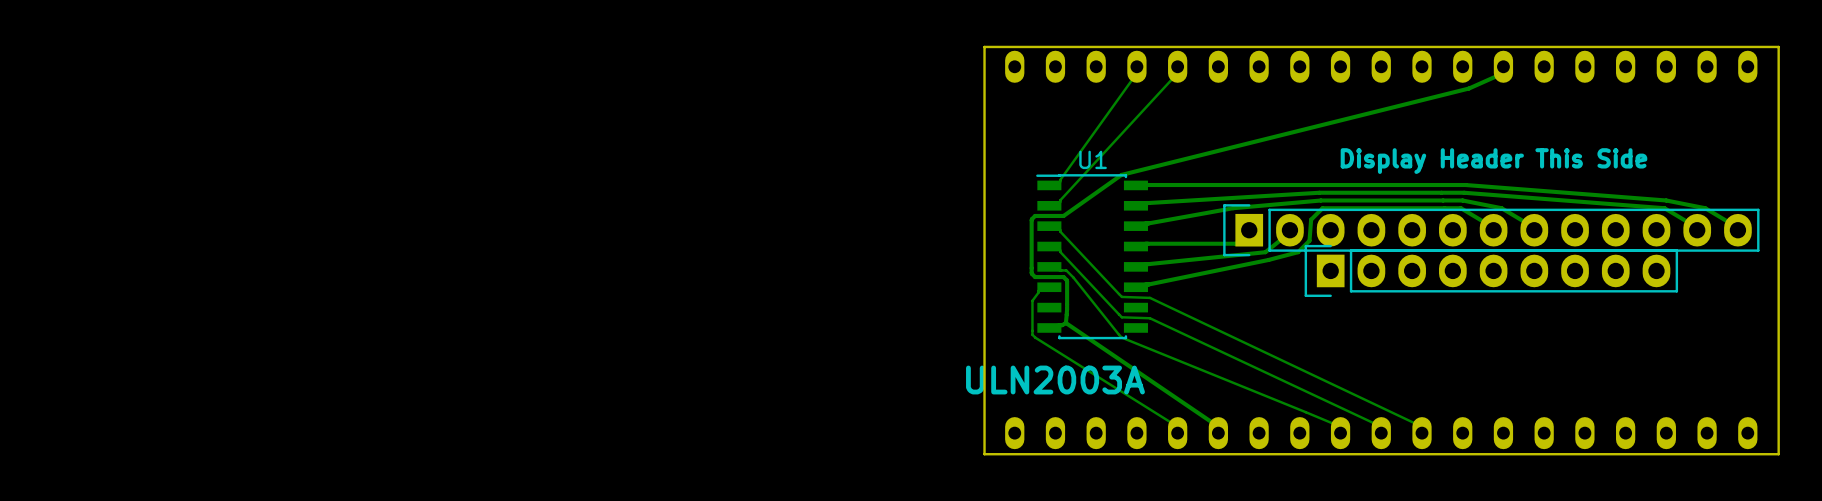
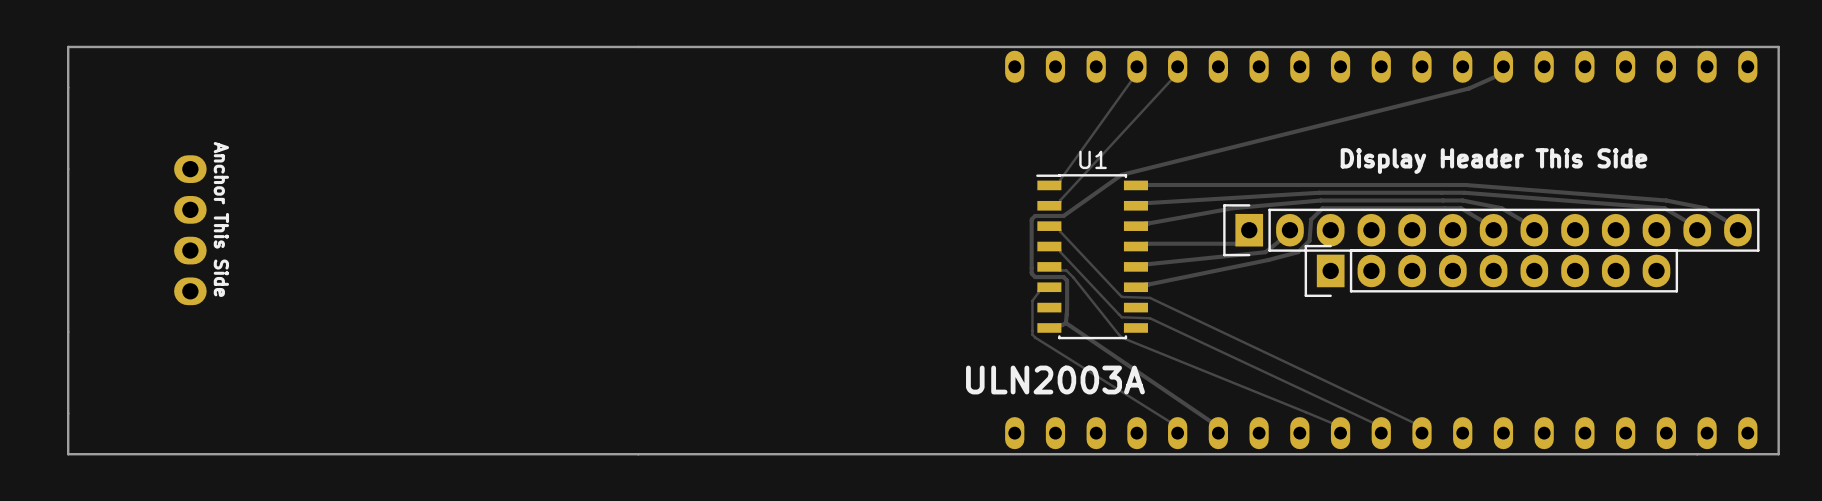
board edge: (984, 46) (984, 454) -> (984, 46) (68, 46) (68, 454) (984, 454)
text: none -> Anchor This Side (221, 219)
part: none -> (190, 230)

